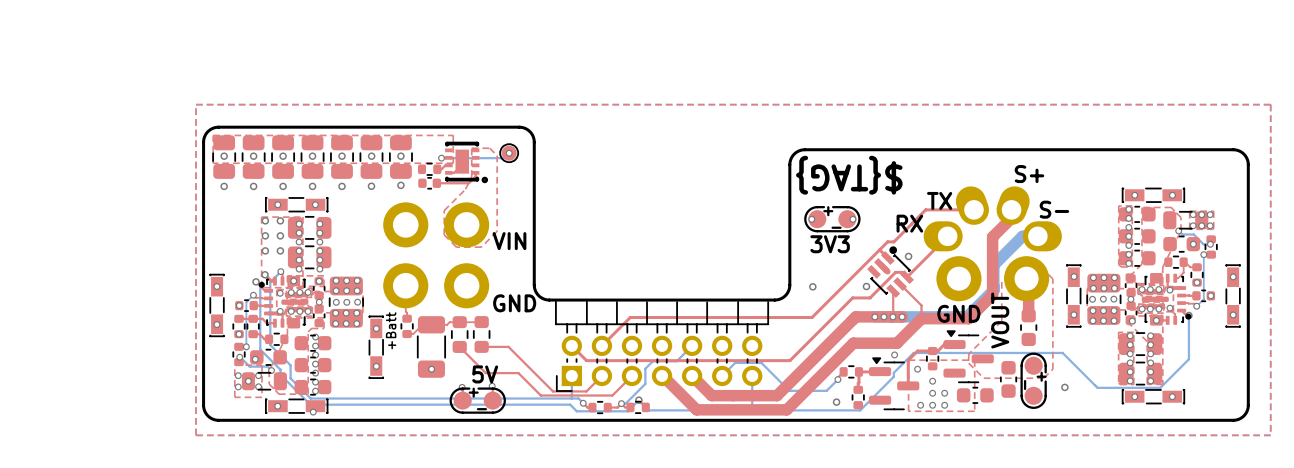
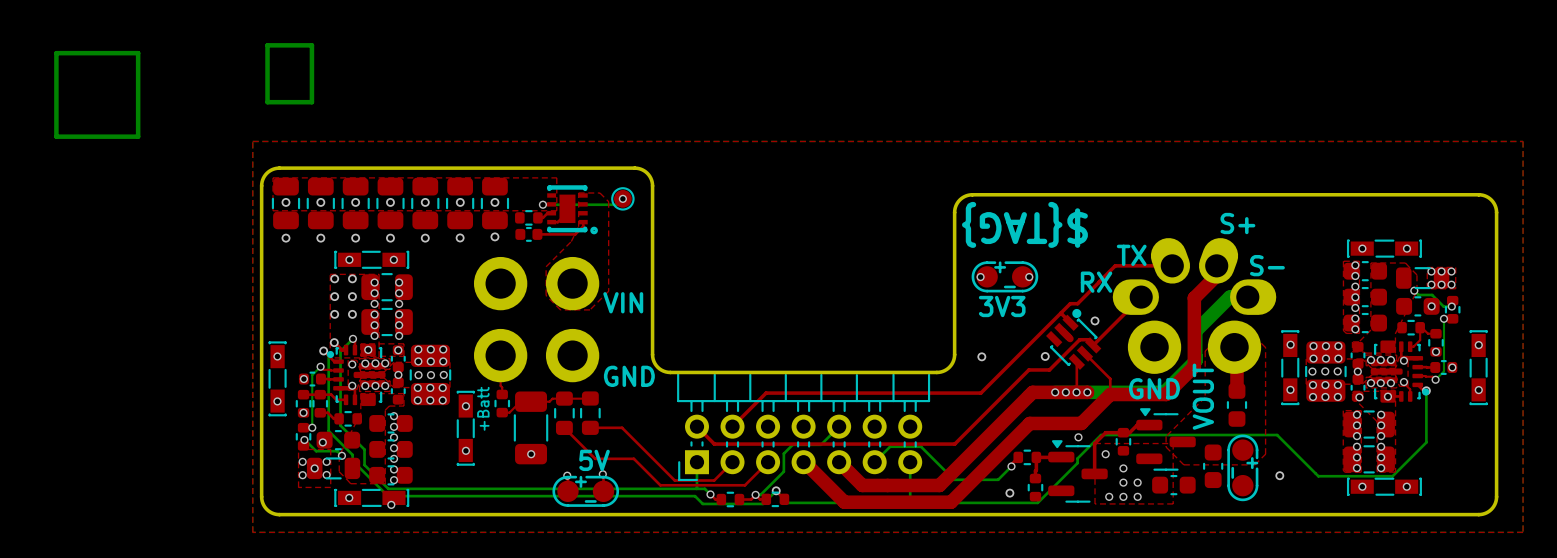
bottom track: none -> (267, 45) (311, 45) (311, 102) (267, 102) (267, 45)
bottom track: none -> (56, 53) (138, 53) (138, 136) (56, 136) (56, 53)

